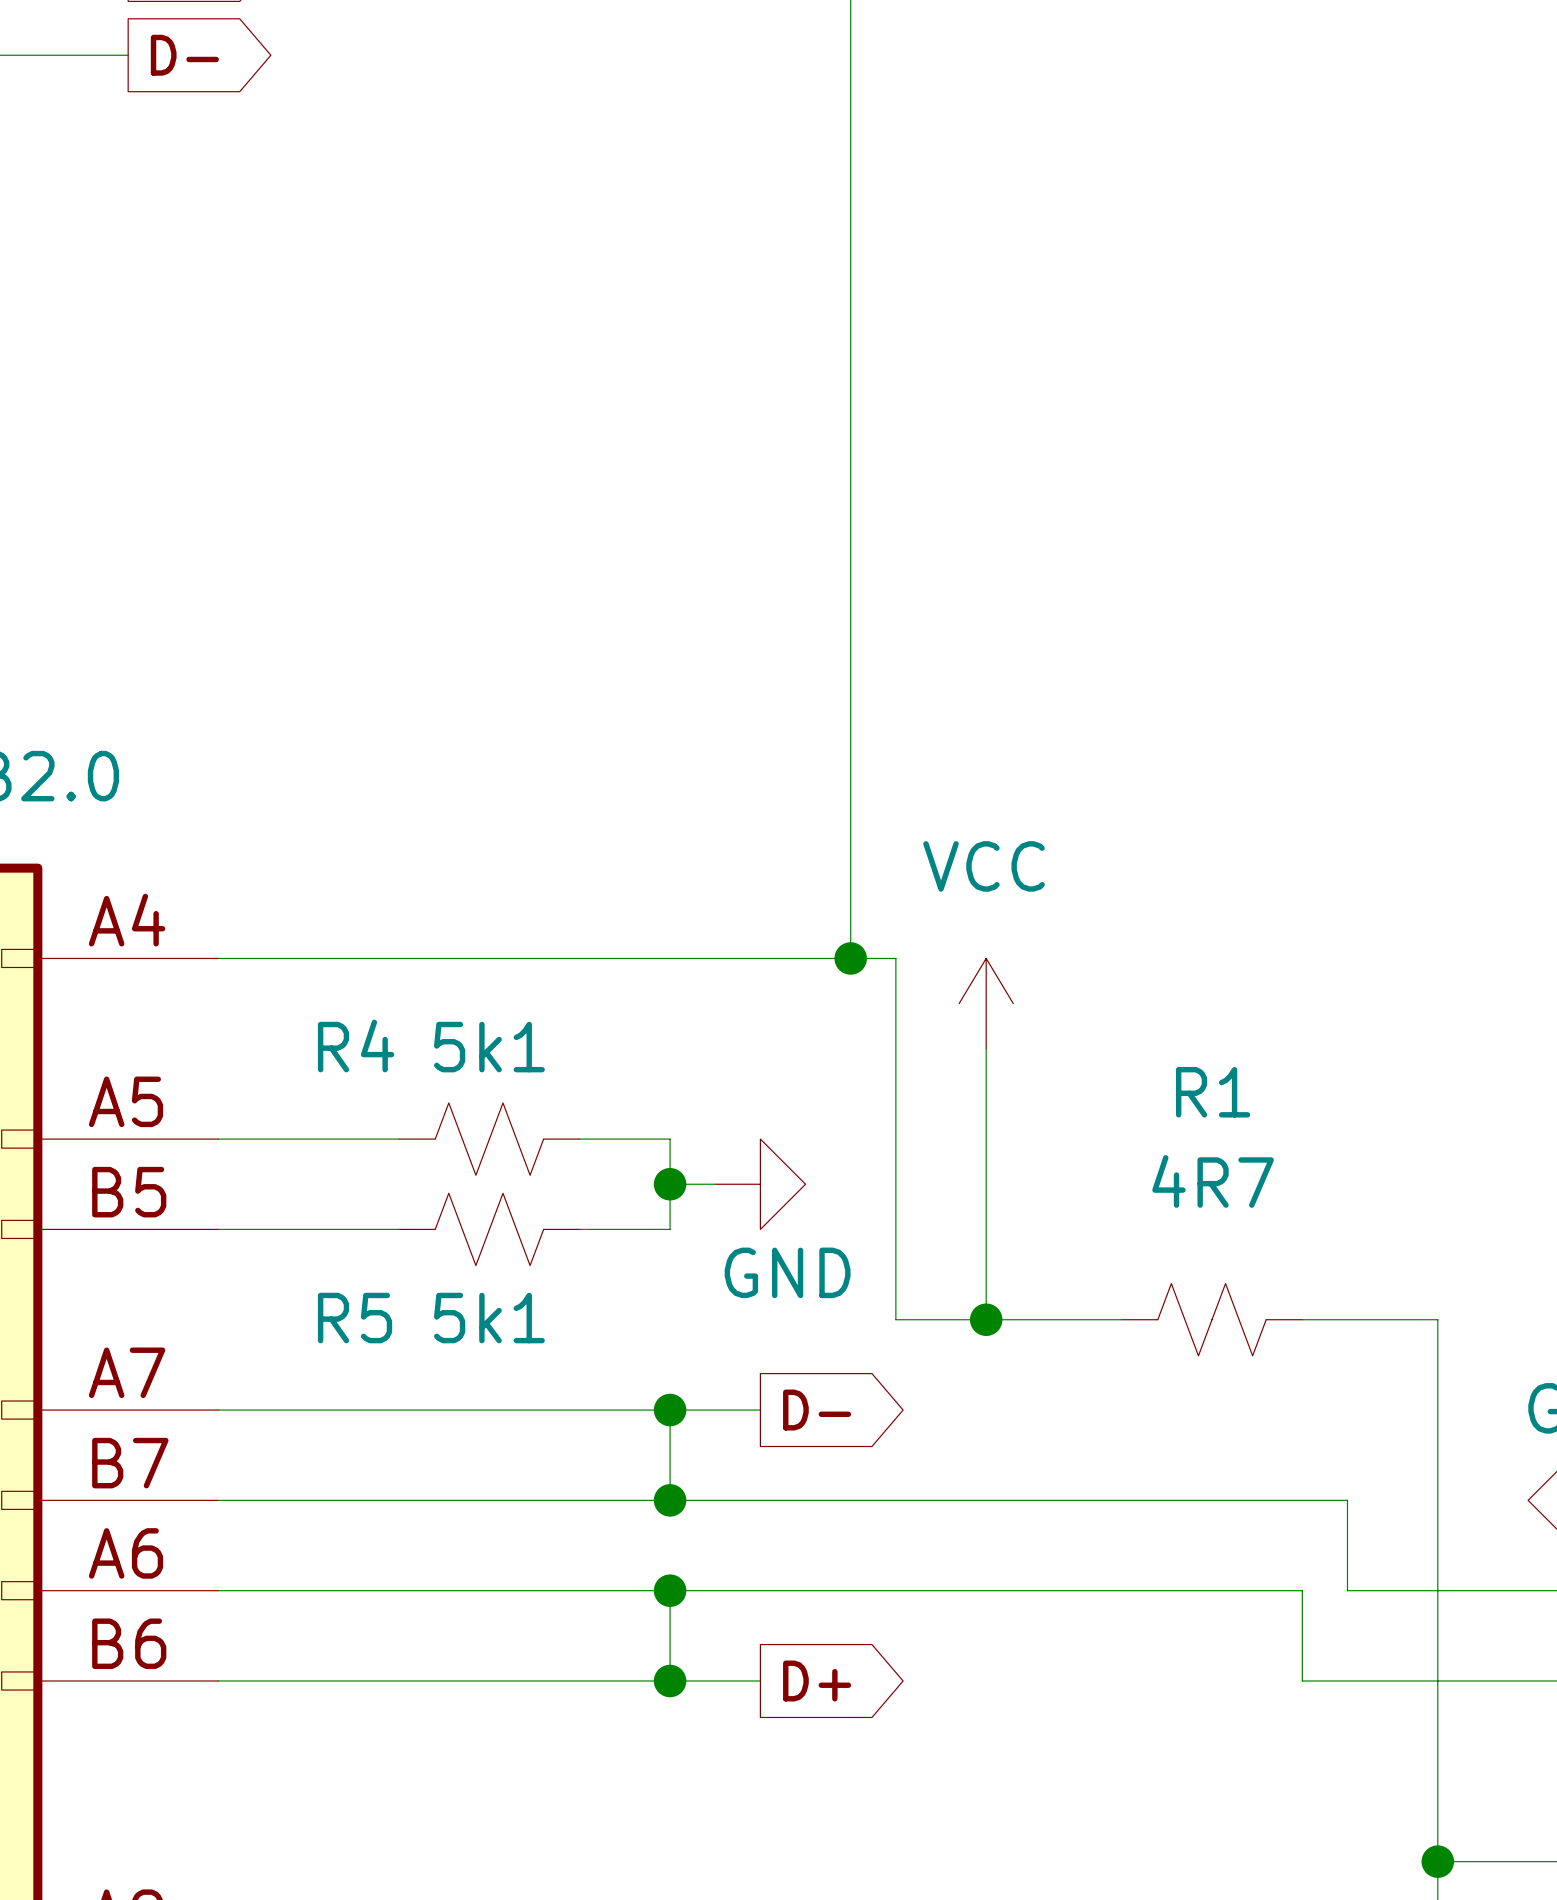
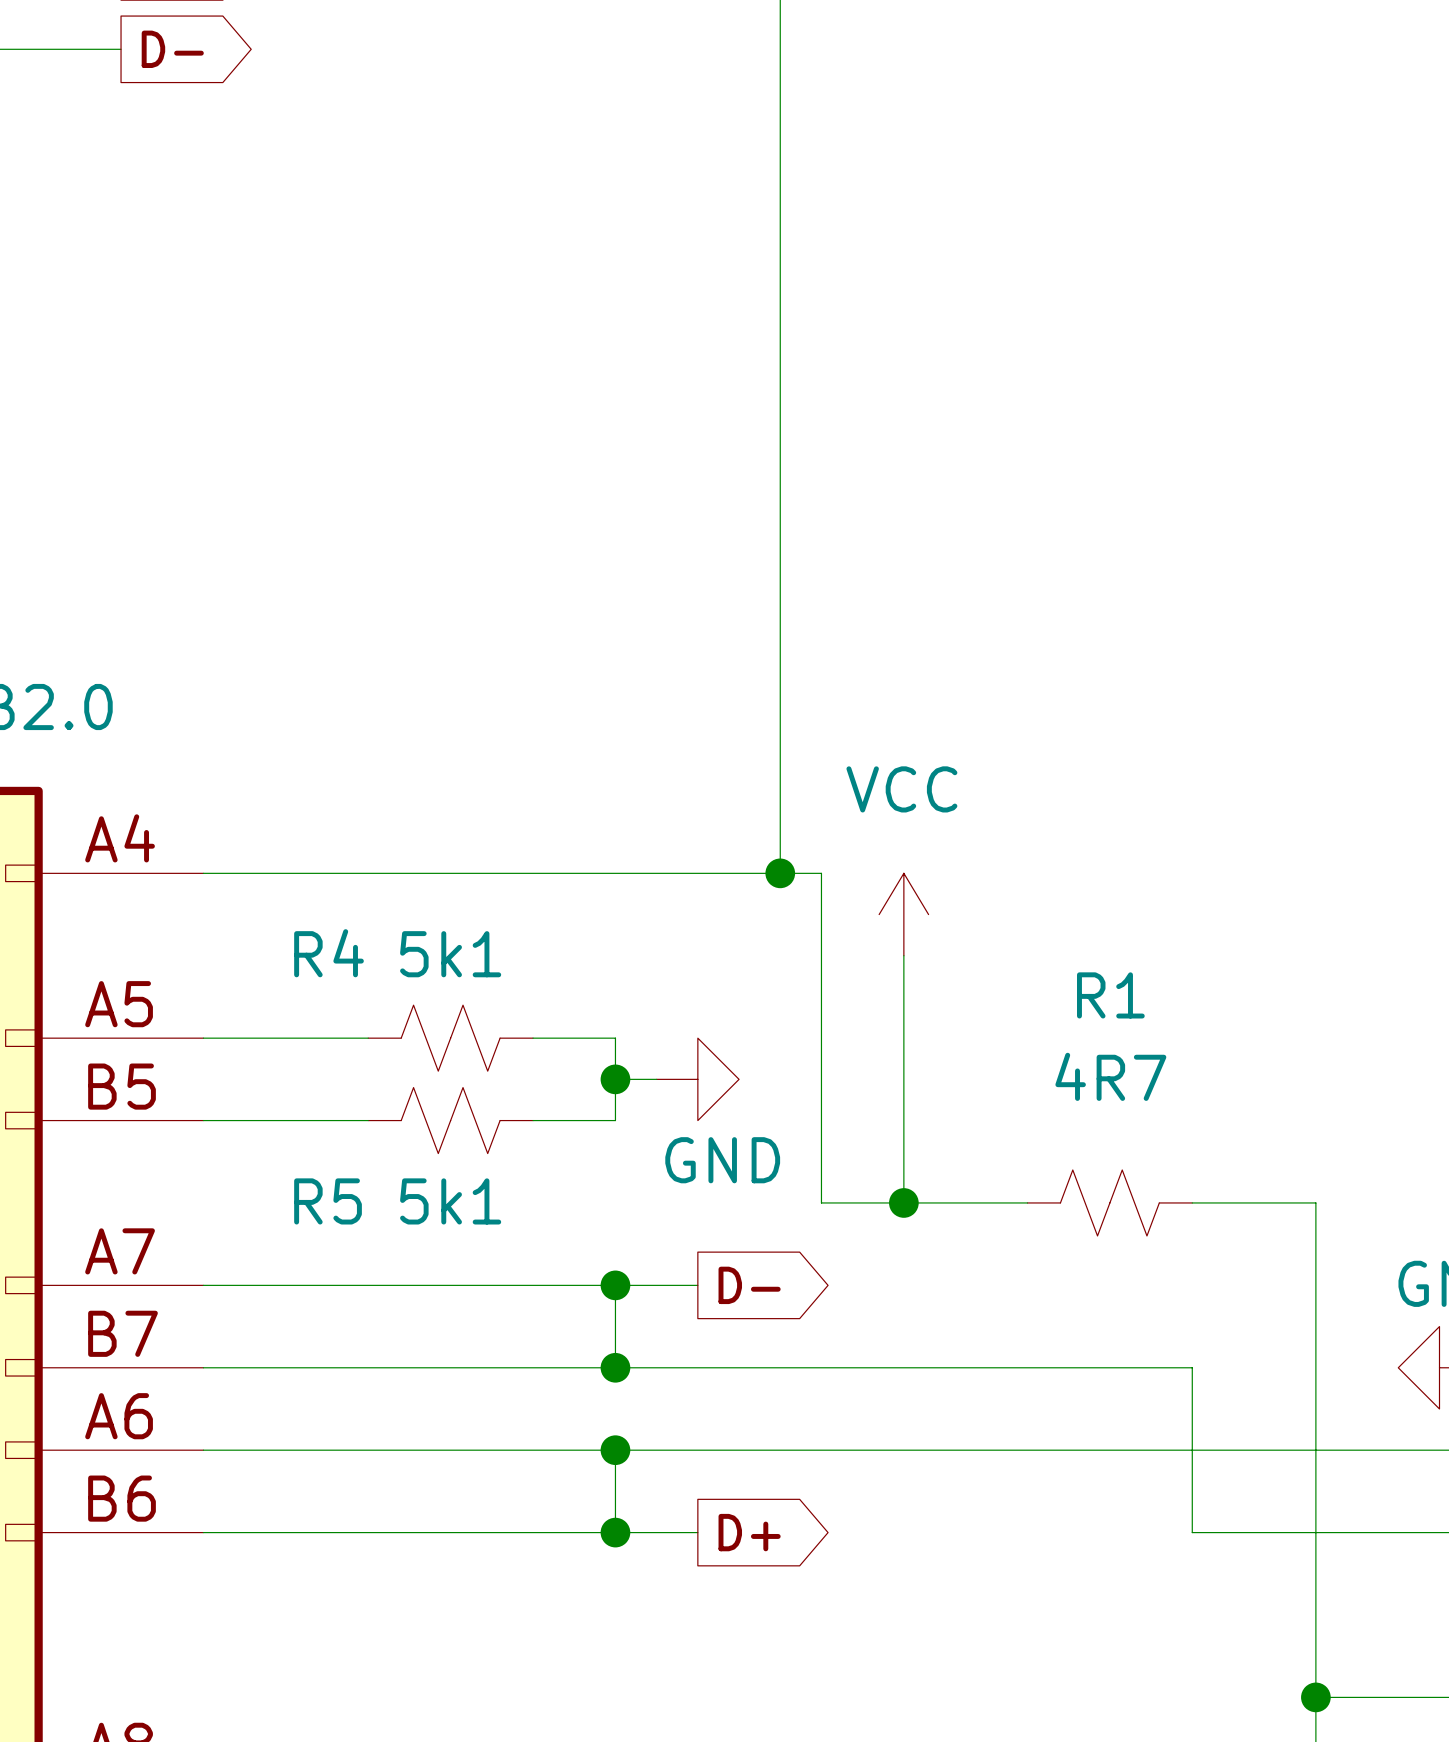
wire: (1302, 1500) (1347, 1500) (1347, 1590) -> (1192, 1367) (1192, 1450) (1233, 1450)

